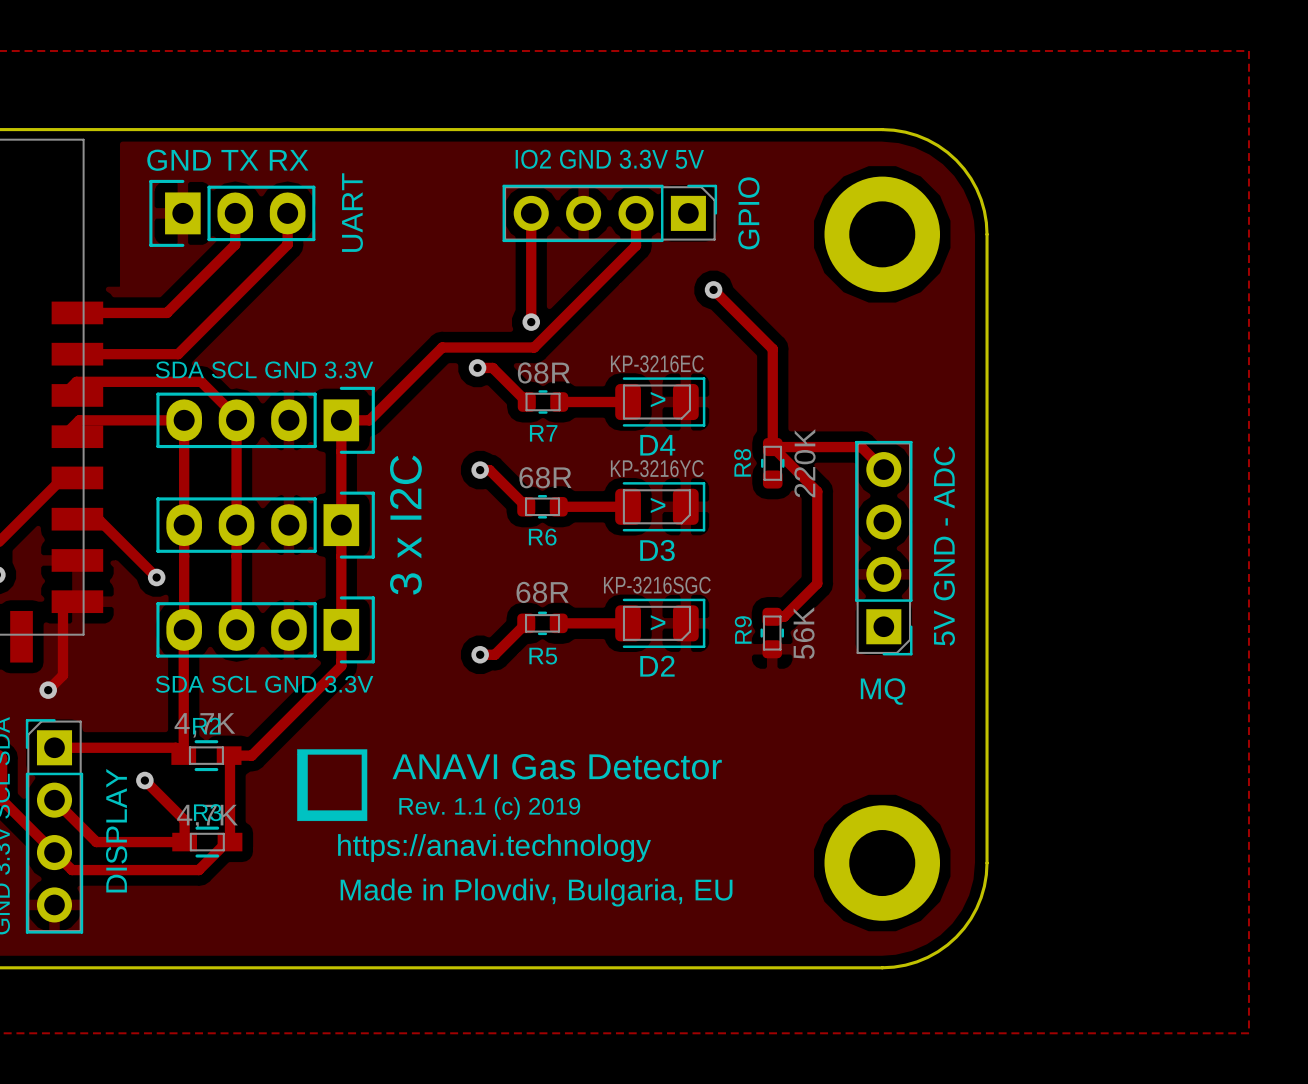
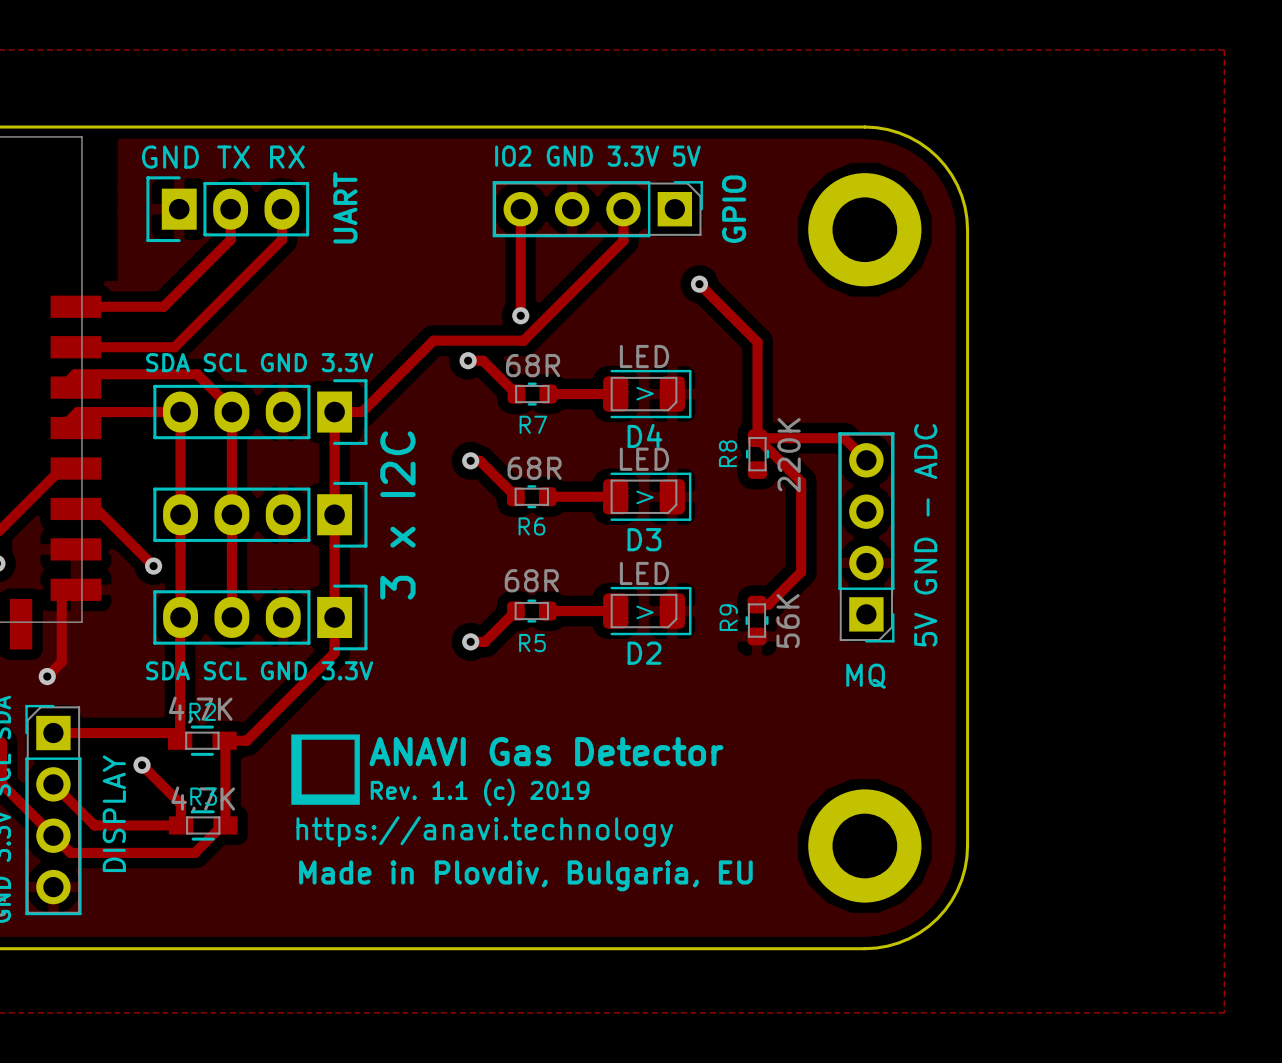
D4 value: KP-3216EC (657, 363) -> LED (644, 356)
D3 value: KP-3216YC (657, 468) -> LED (644, 459)
D2 value: KP-3216SGC (657, 585) -> LED (644, 573)

